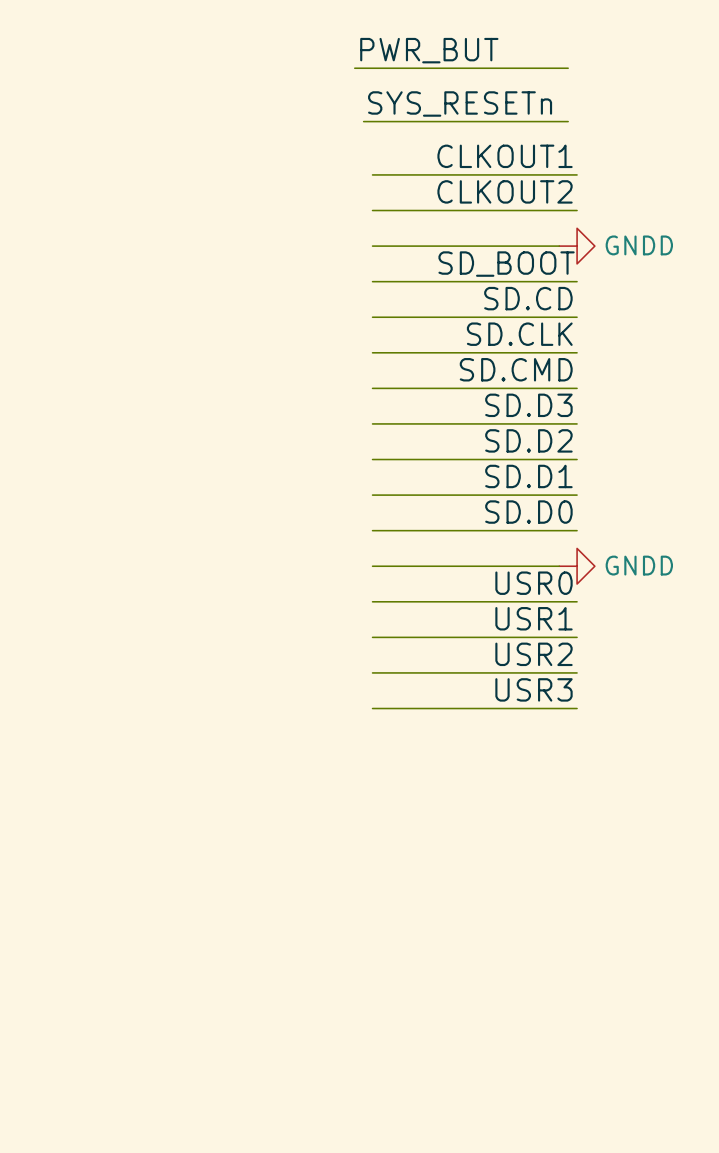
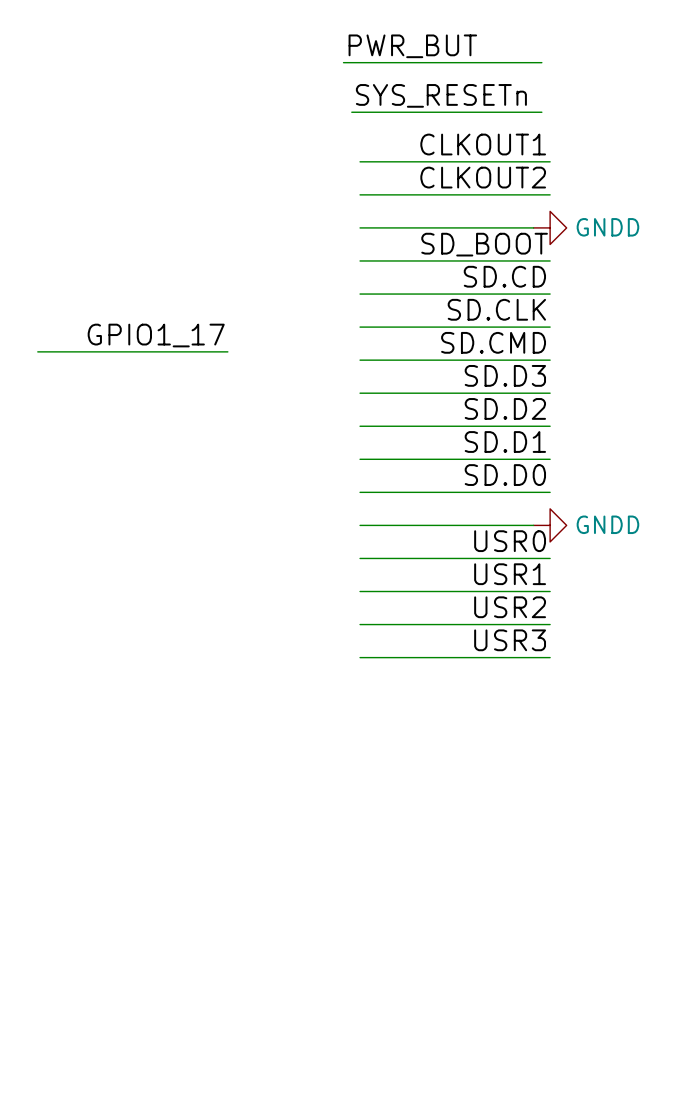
label: none -> GPIO1_17 (156, 335)
wire: none -> (37, 351) (227, 351)

